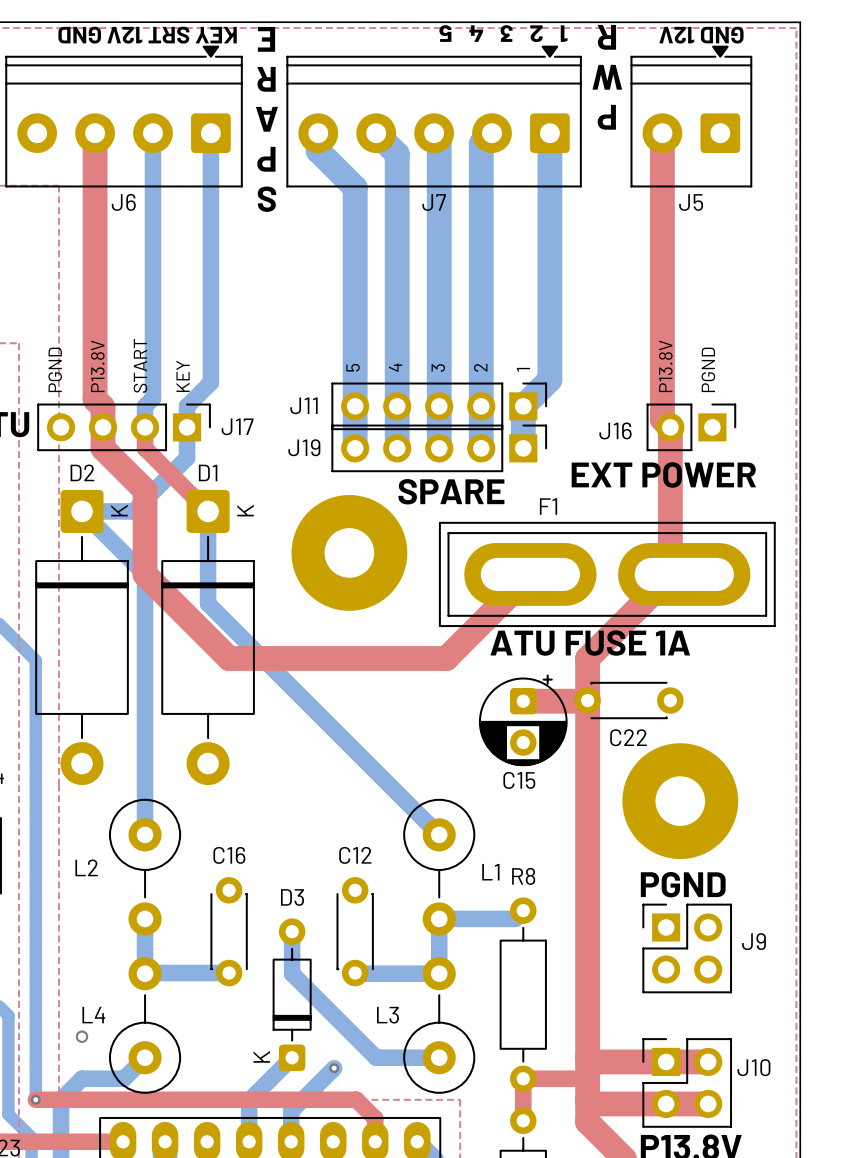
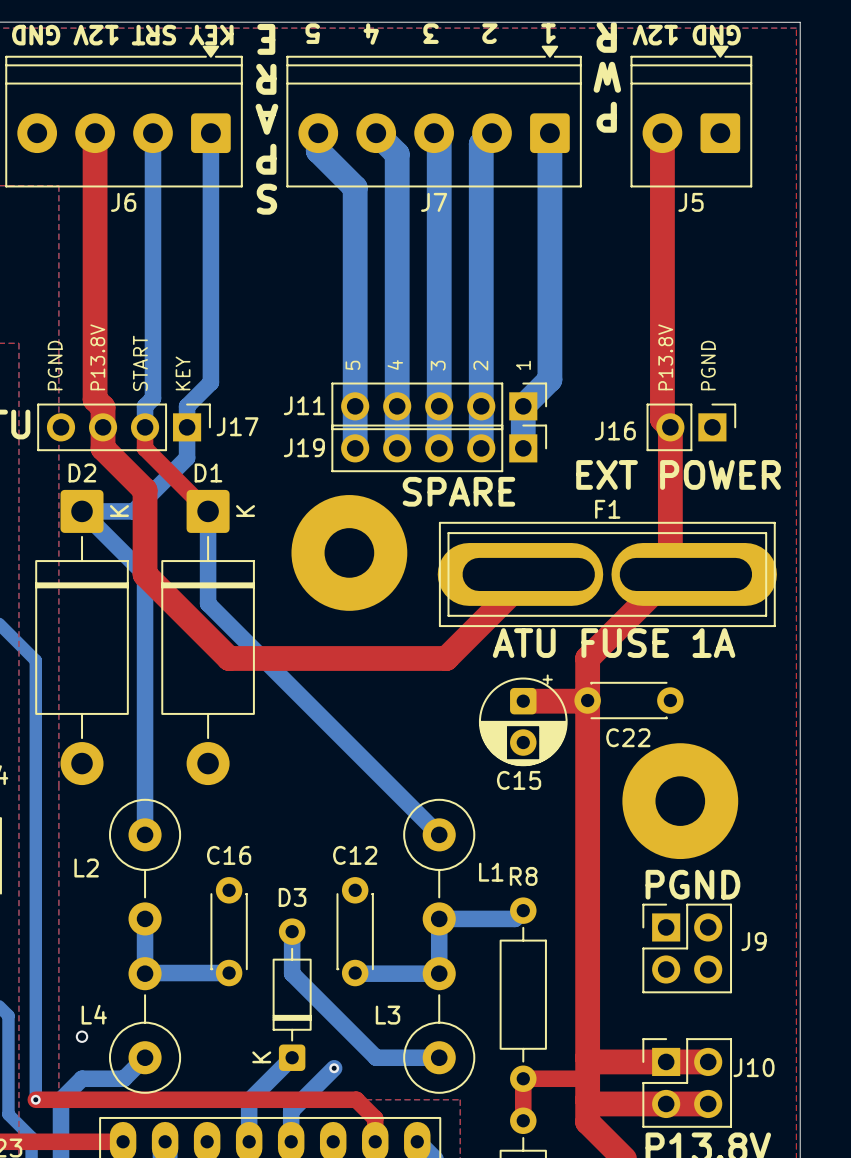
F1 name position: F1 (548, 506) -> F1 (607, 509)
F1 footprint: [438, 521, 776, 628] -> [437, 521, 777, 628]

